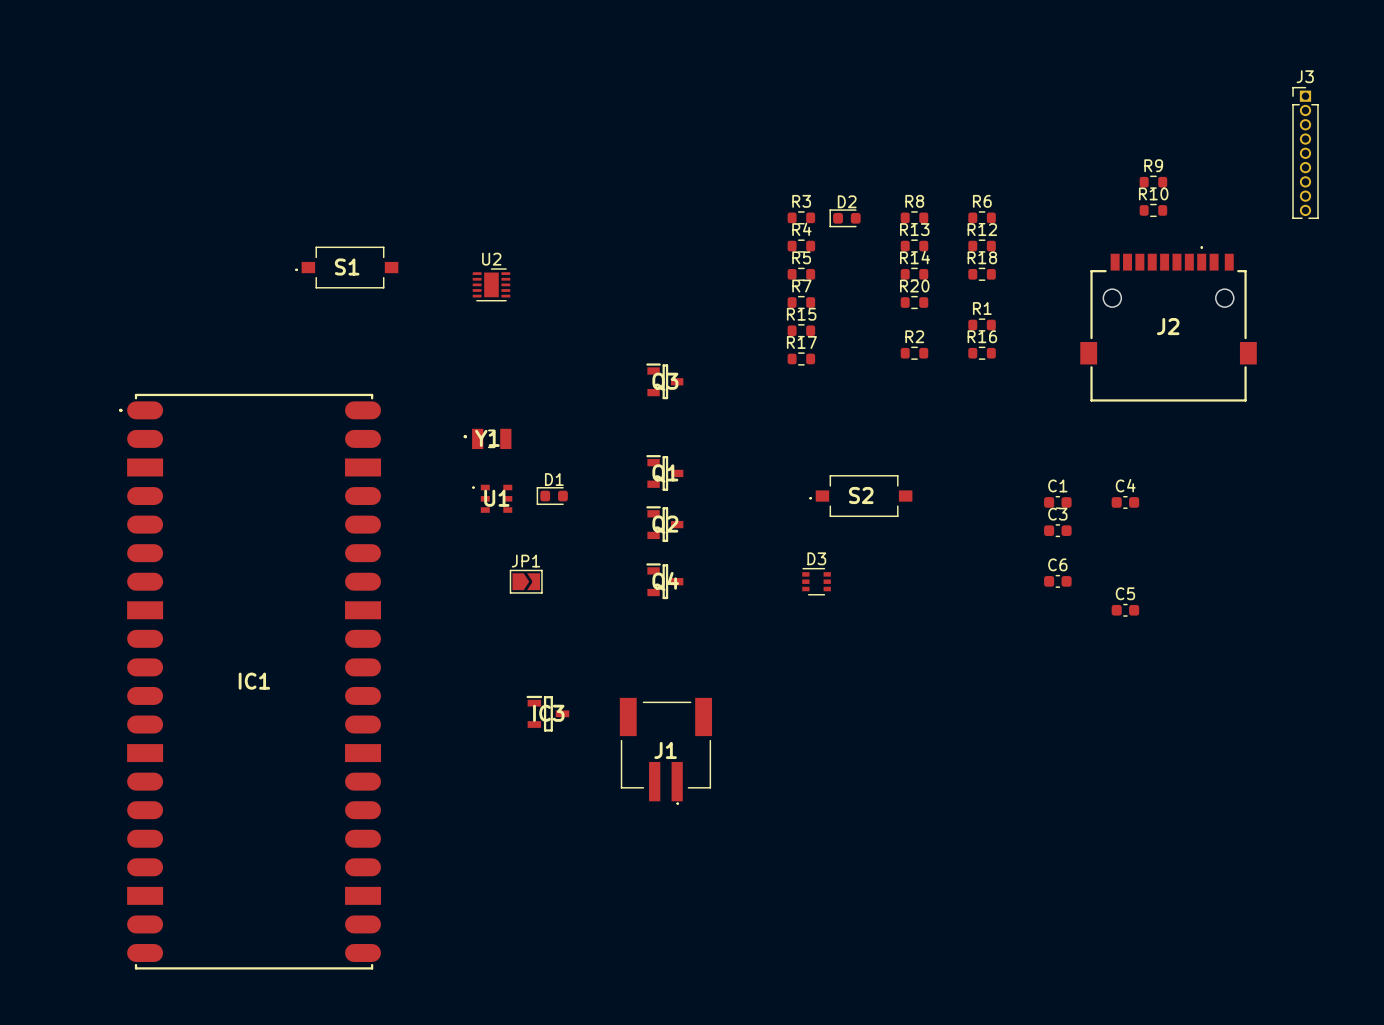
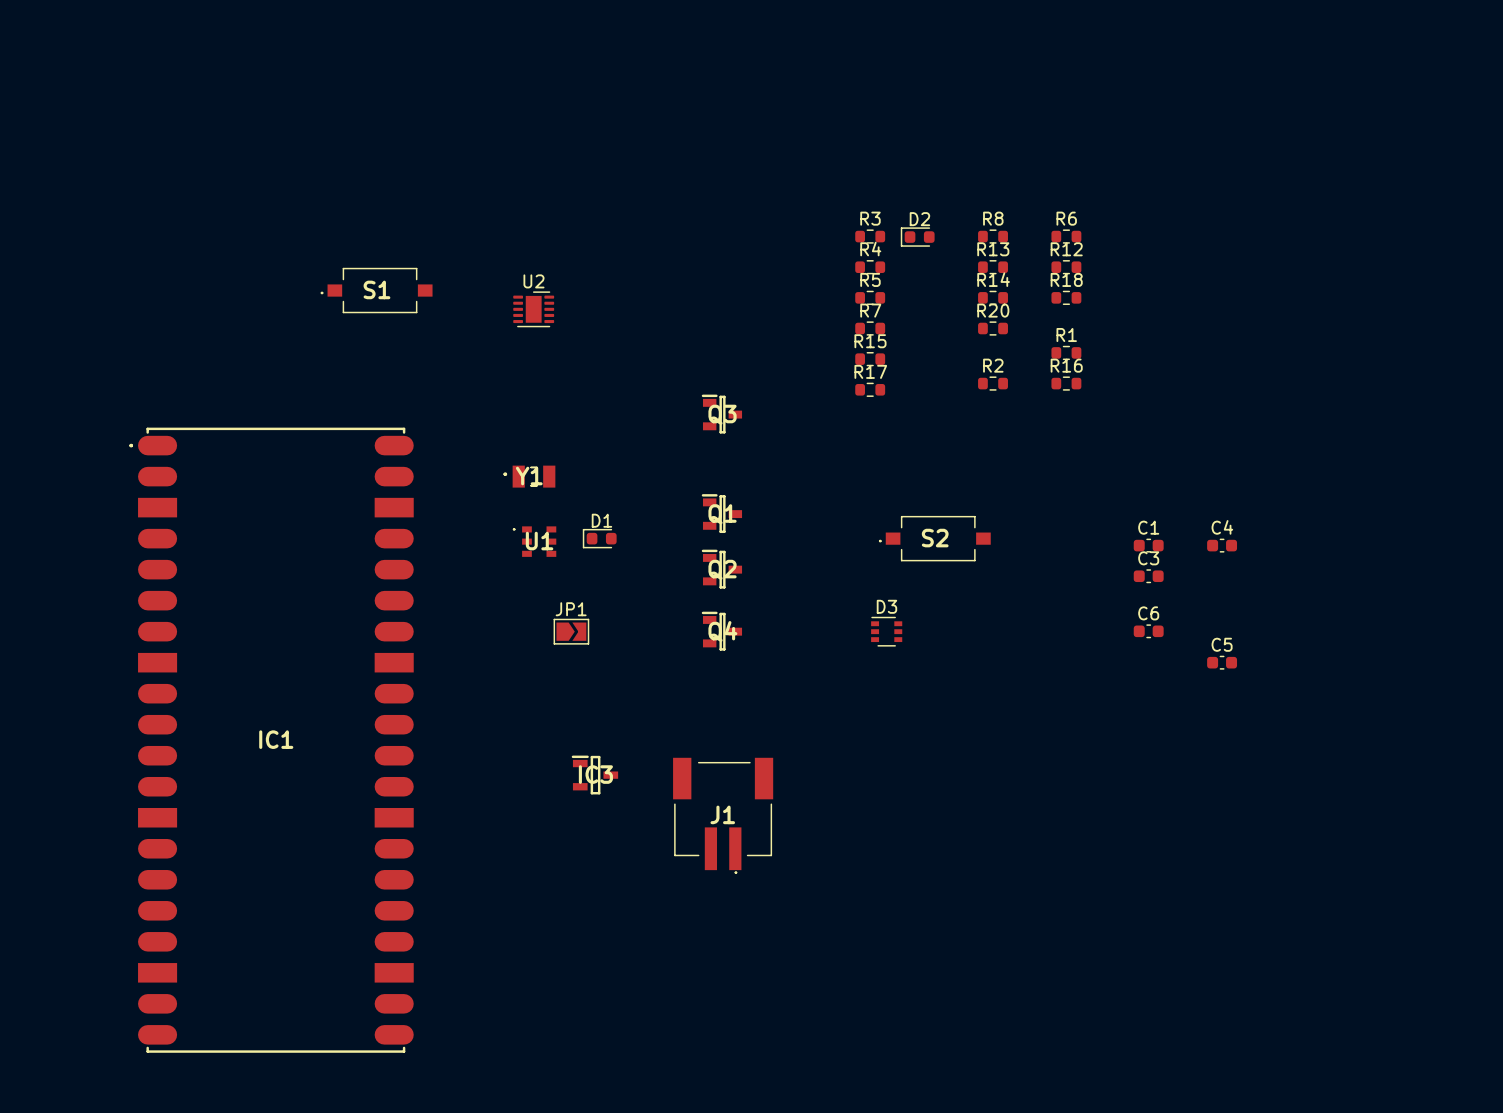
J3: (1305, 152) -> none
R9: (1153, 182) -> none
R10: (1153, 210) -> none
J2: (1168, 324) -> none

